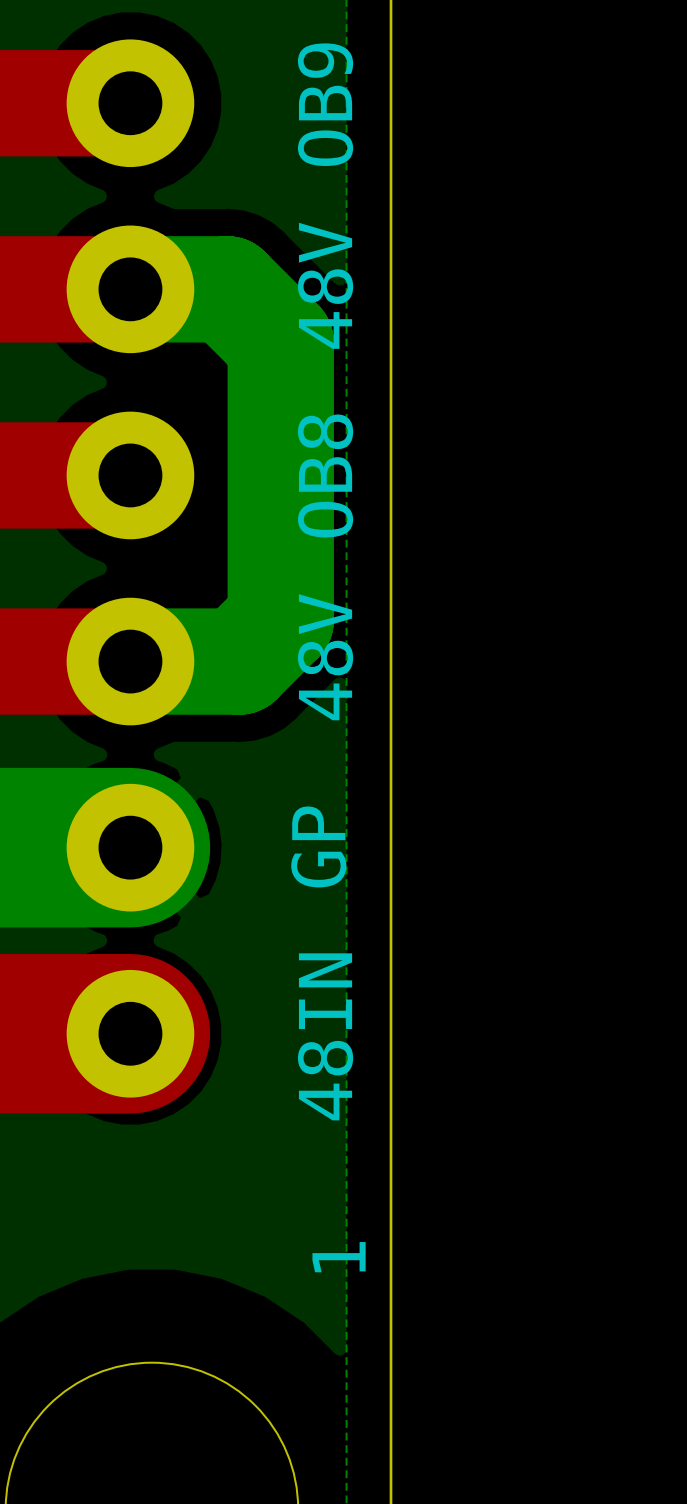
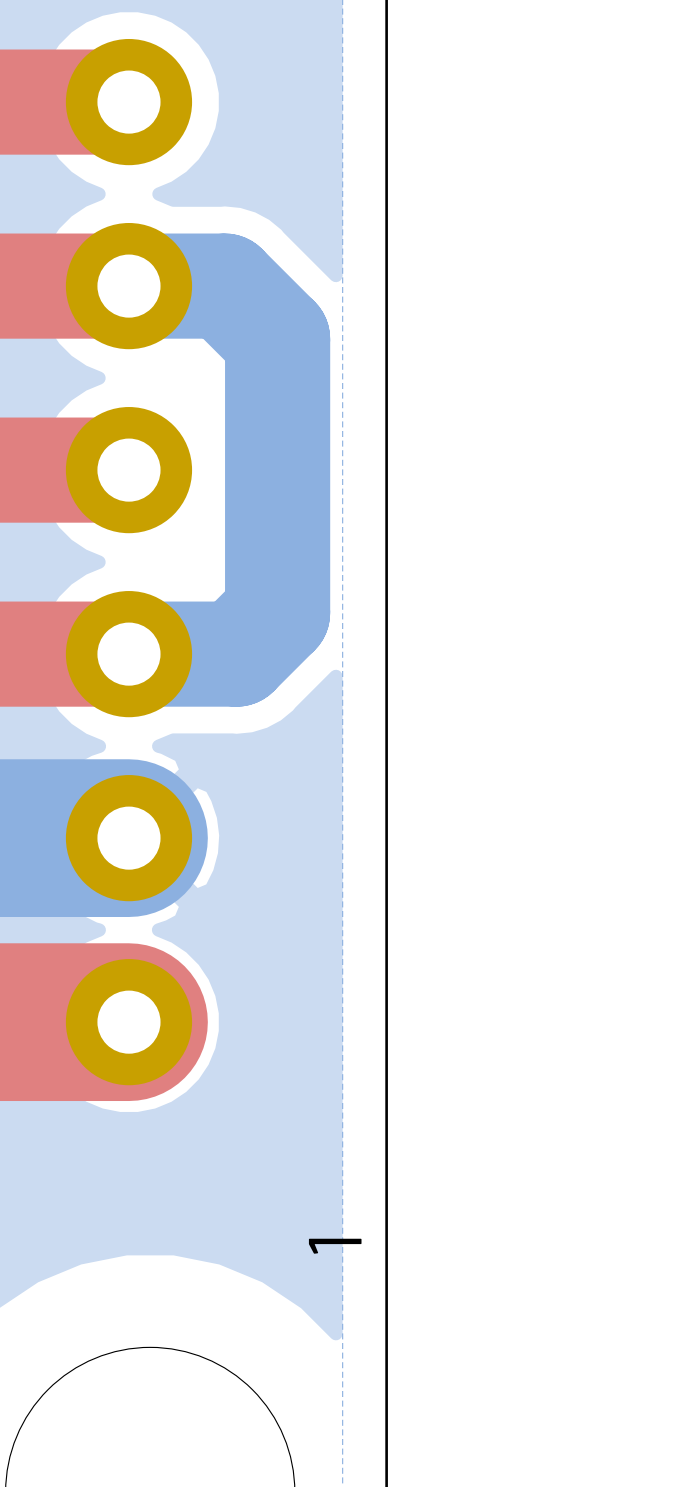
text: OB9 (325, 104) -> none
text: 48V (325, 285) -> none
text: OB8 (325, 475) -> none
text: 48V (325, 657) -> none
text: GP (318, 846) -> none
text: 48IN (325, 1036) -> none

